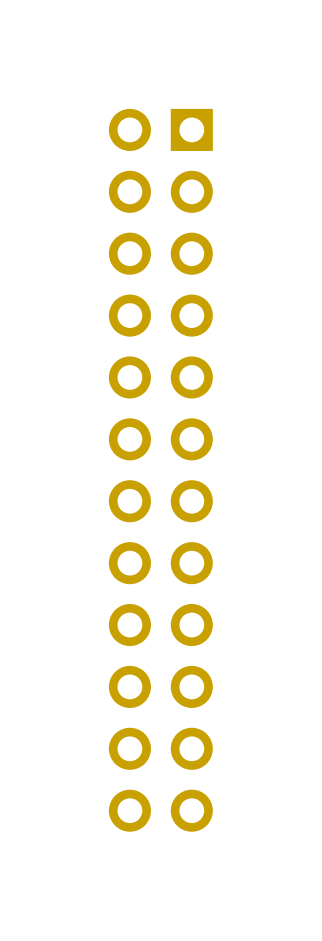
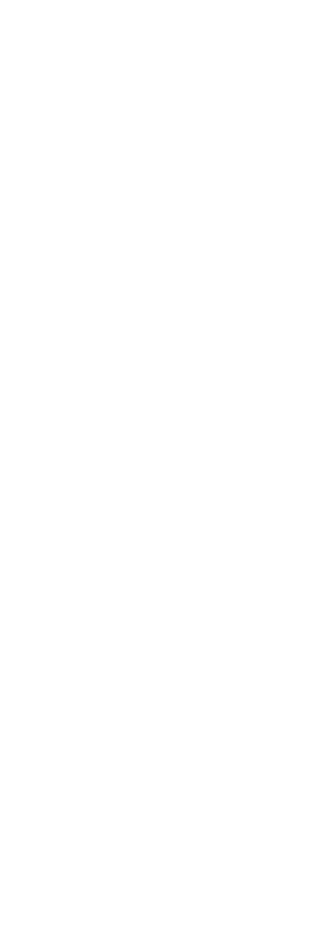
part: (160, 470) -> none

